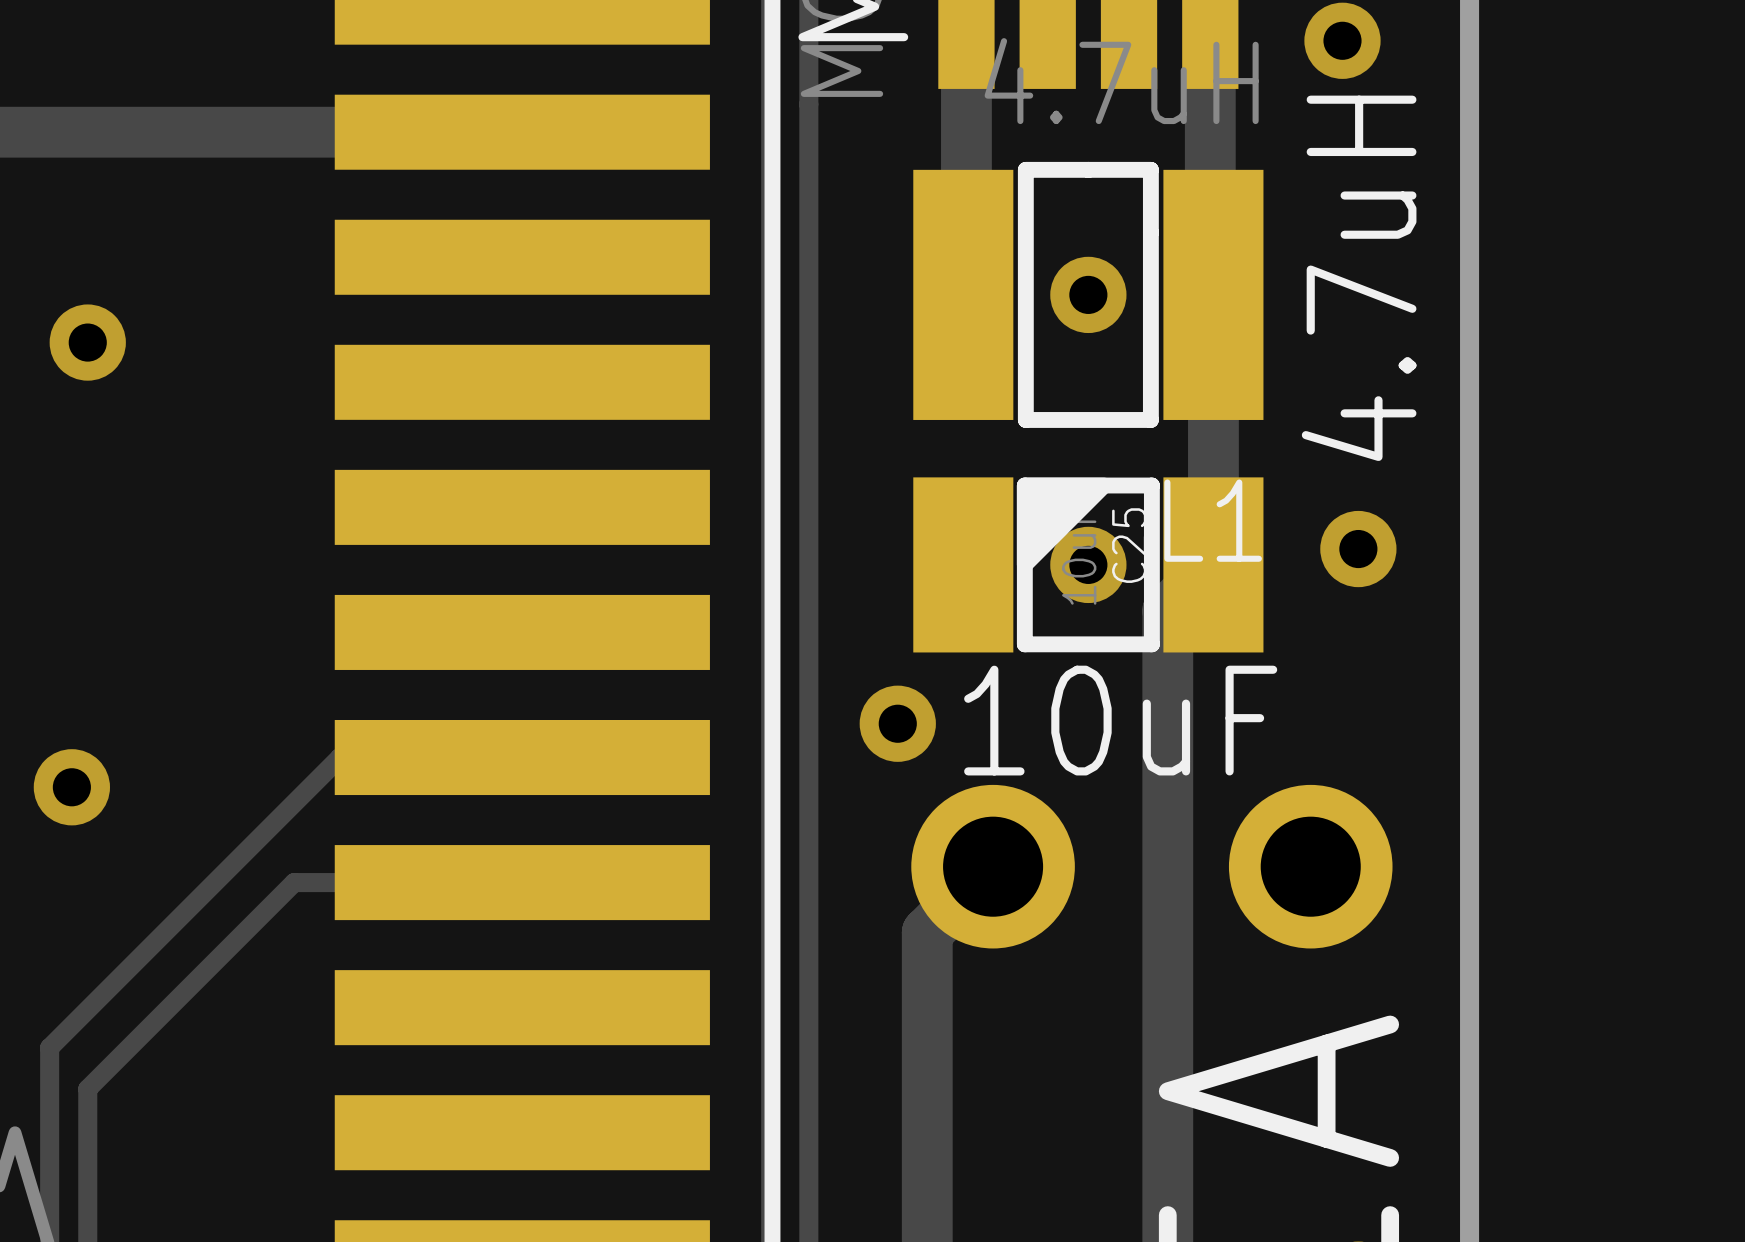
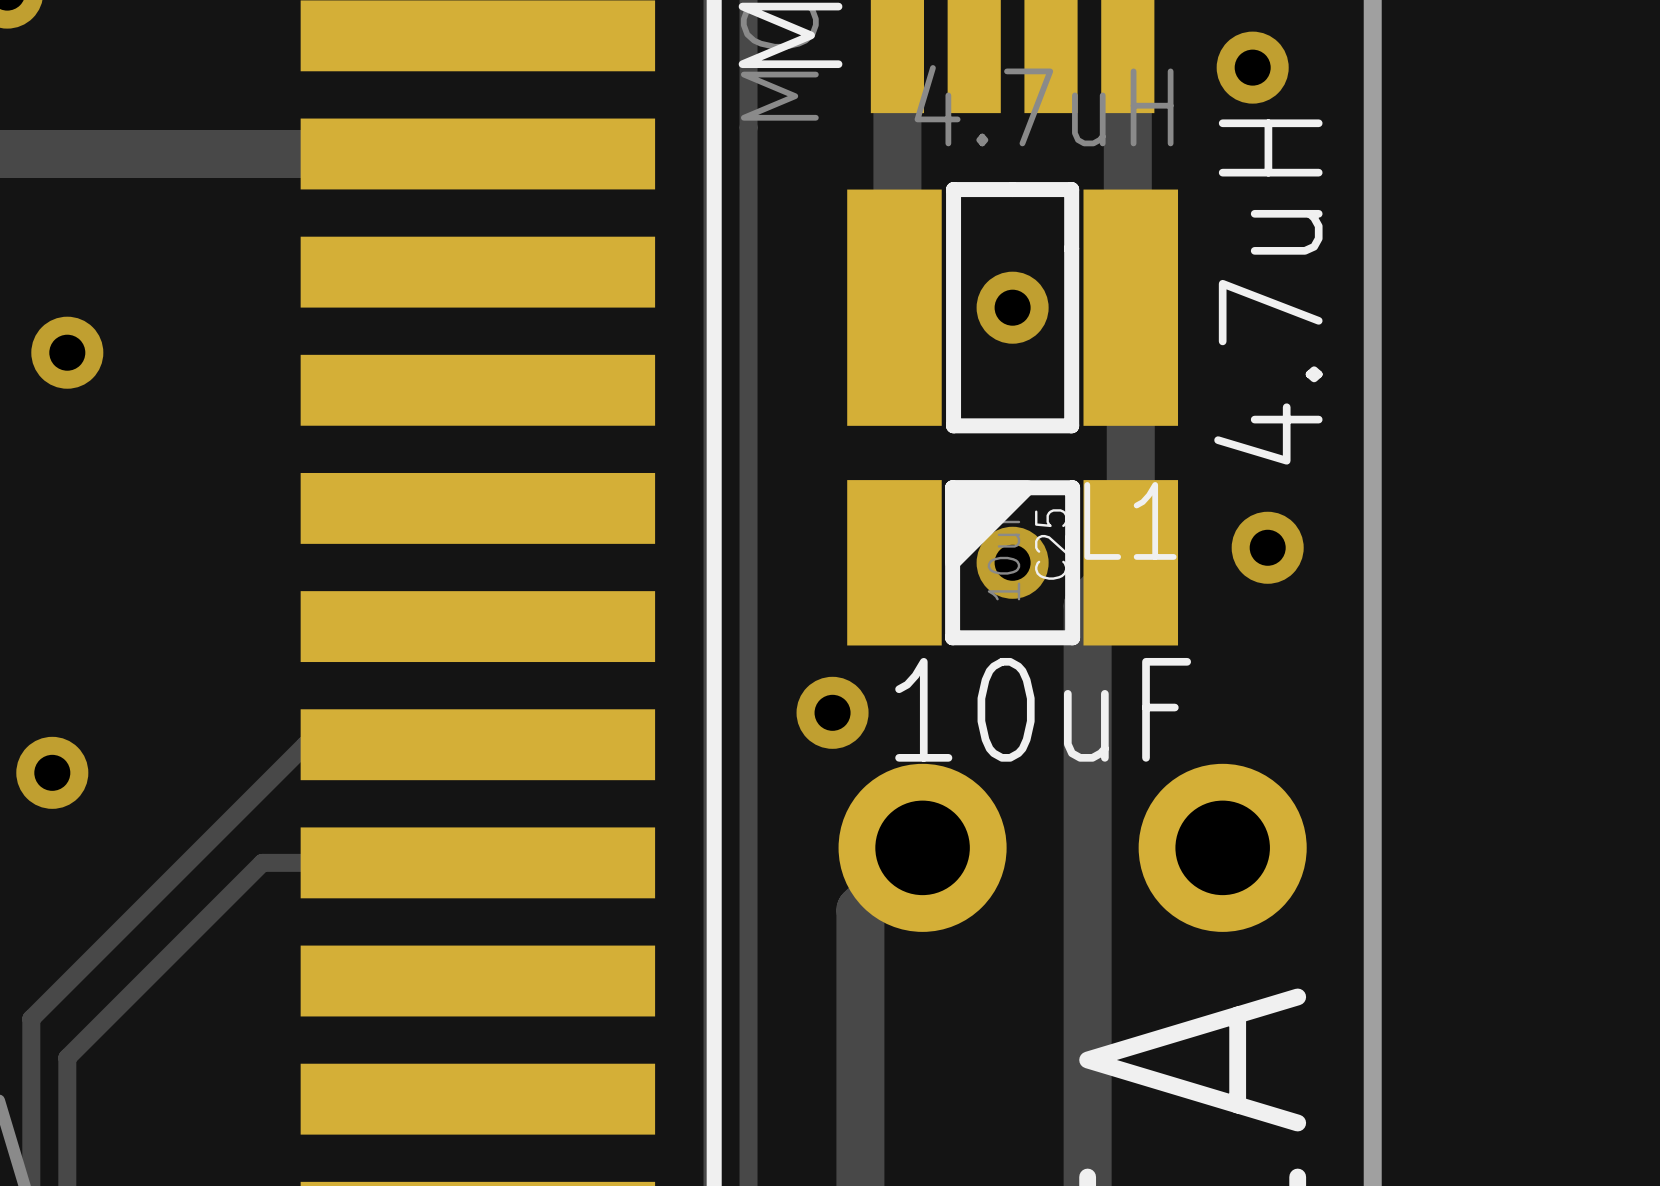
part footprint: [911, 784, 1393, 949] -> [838, 763, 1307, 932]

